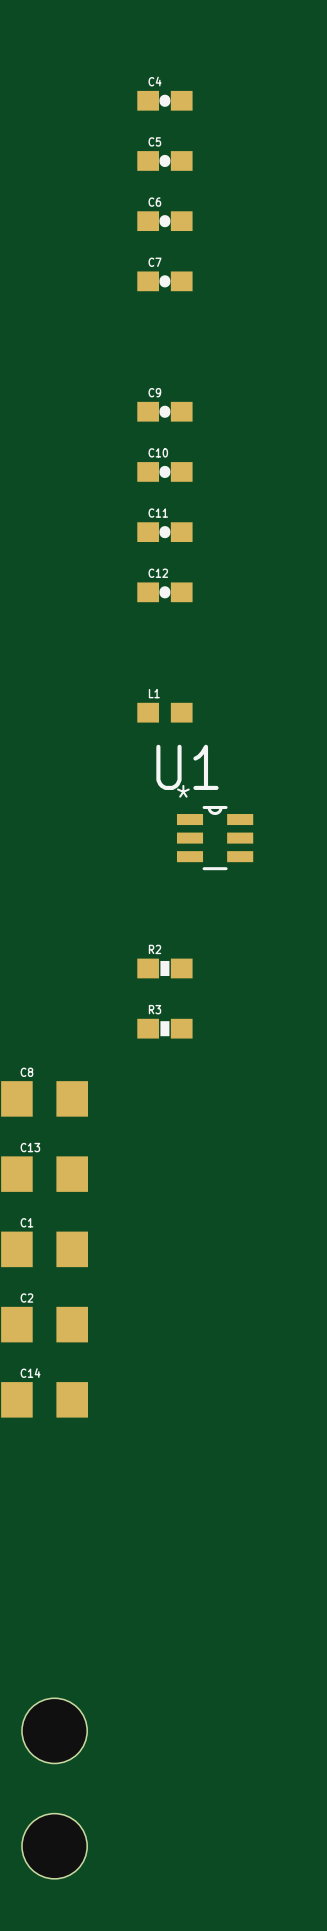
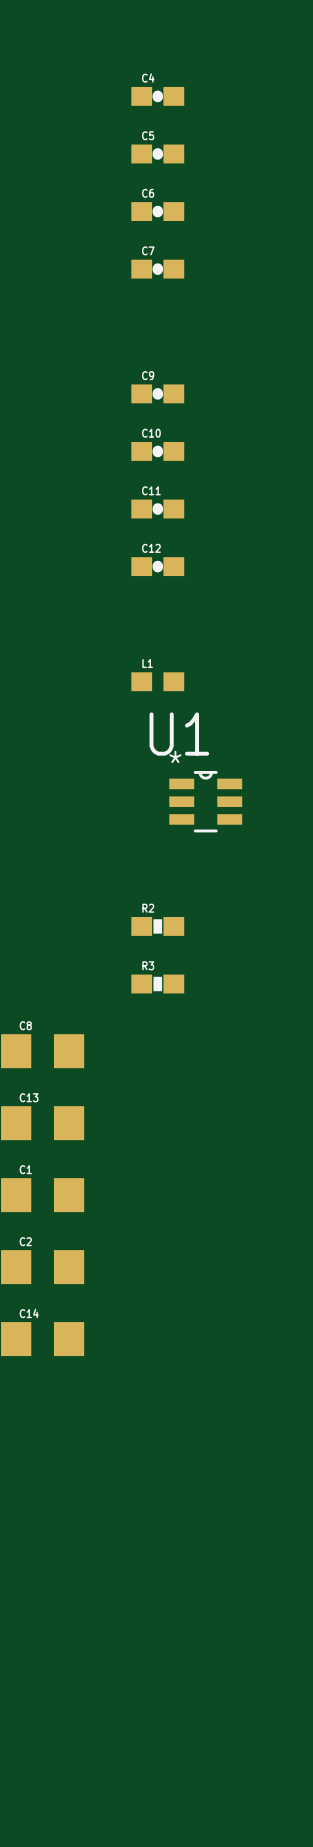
part: (54, 1730) -> none
part: (54, 1846) -> none

